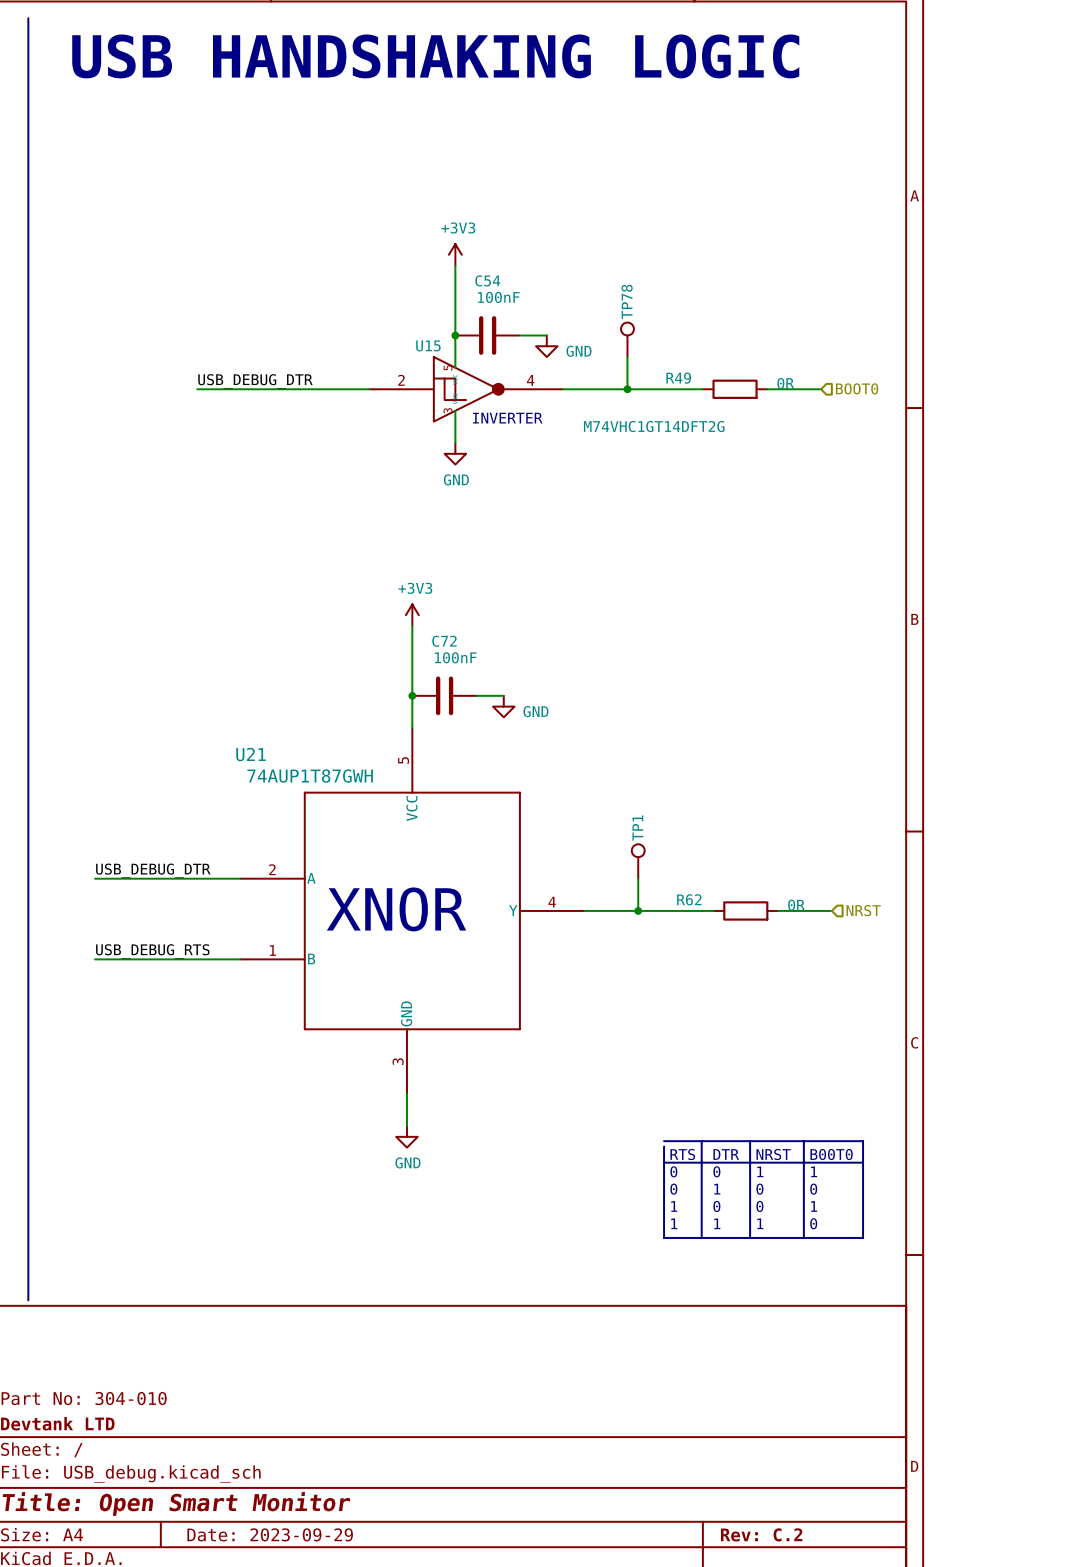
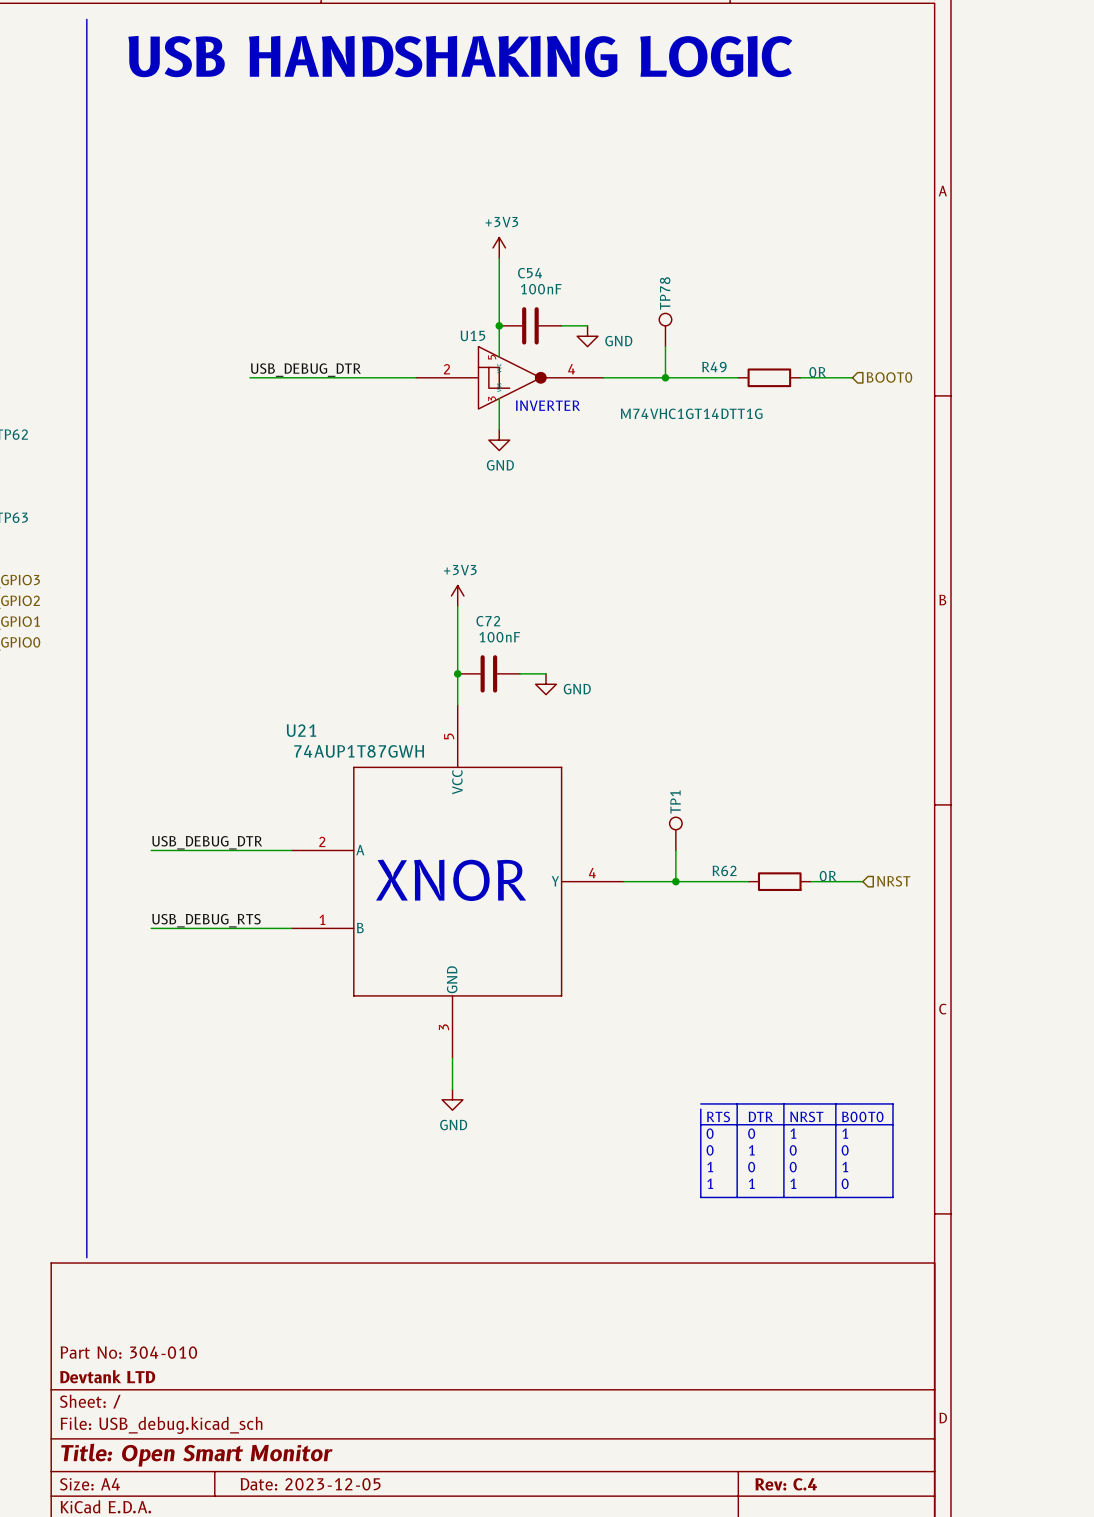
U15 value: M74VHC1GT14DFT2G (654, 426) -> M74VHC1GT14DTT1G (691, 413)
title block: Date: 2023-09-29 (270, 1534) -> Date: 2023-12-05 (310, 1484)
title block: Rev: C.2 (761, 1534) -> Rev: C.4 (786, 1484)

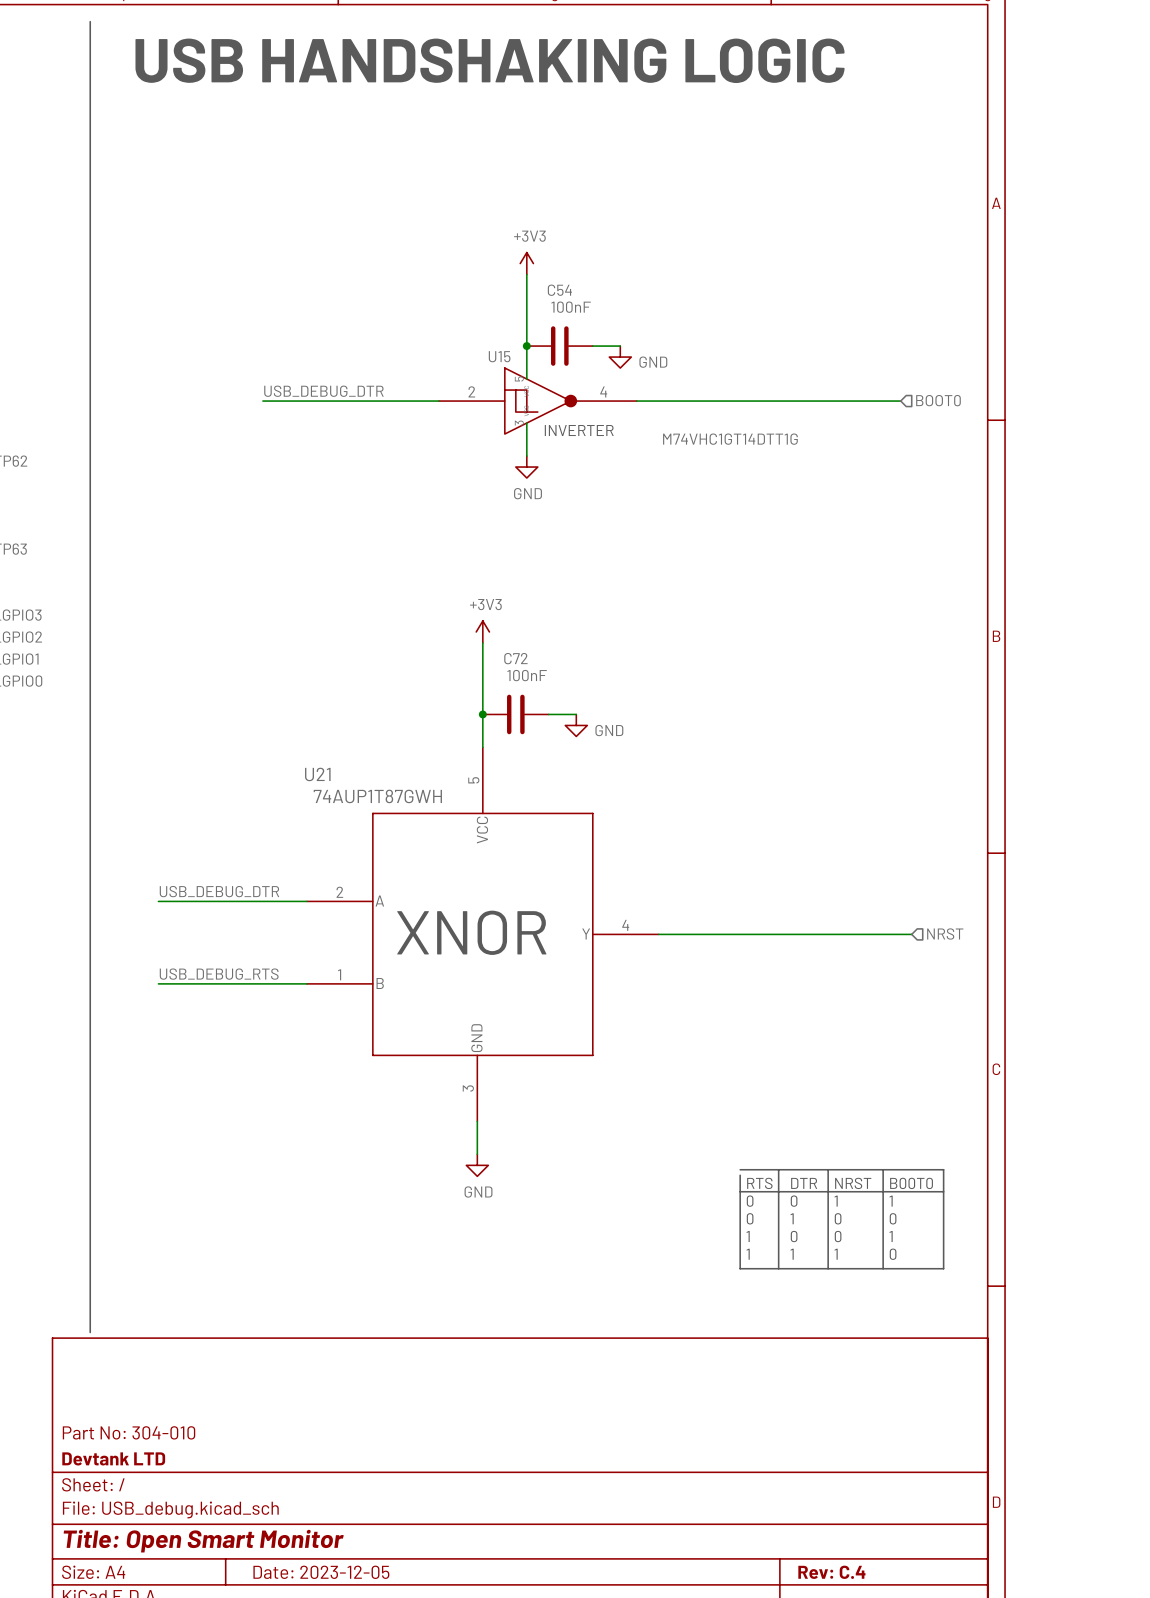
TP78: (665, 330) -> none
wire: (665, 346) (665, 377) -> none
junction: (665, 377) -> none
wire: none -> (779, 401) (845, 401)
R49: 0R (769, 377) -> none
TP1: (675, 833) -> none
wire: (675, 850) (675, 881) -> none
junction: (675, 881) -> none
wire: none -> (790, 934) (856, 934)
R62: 0R (779, 881) -> none

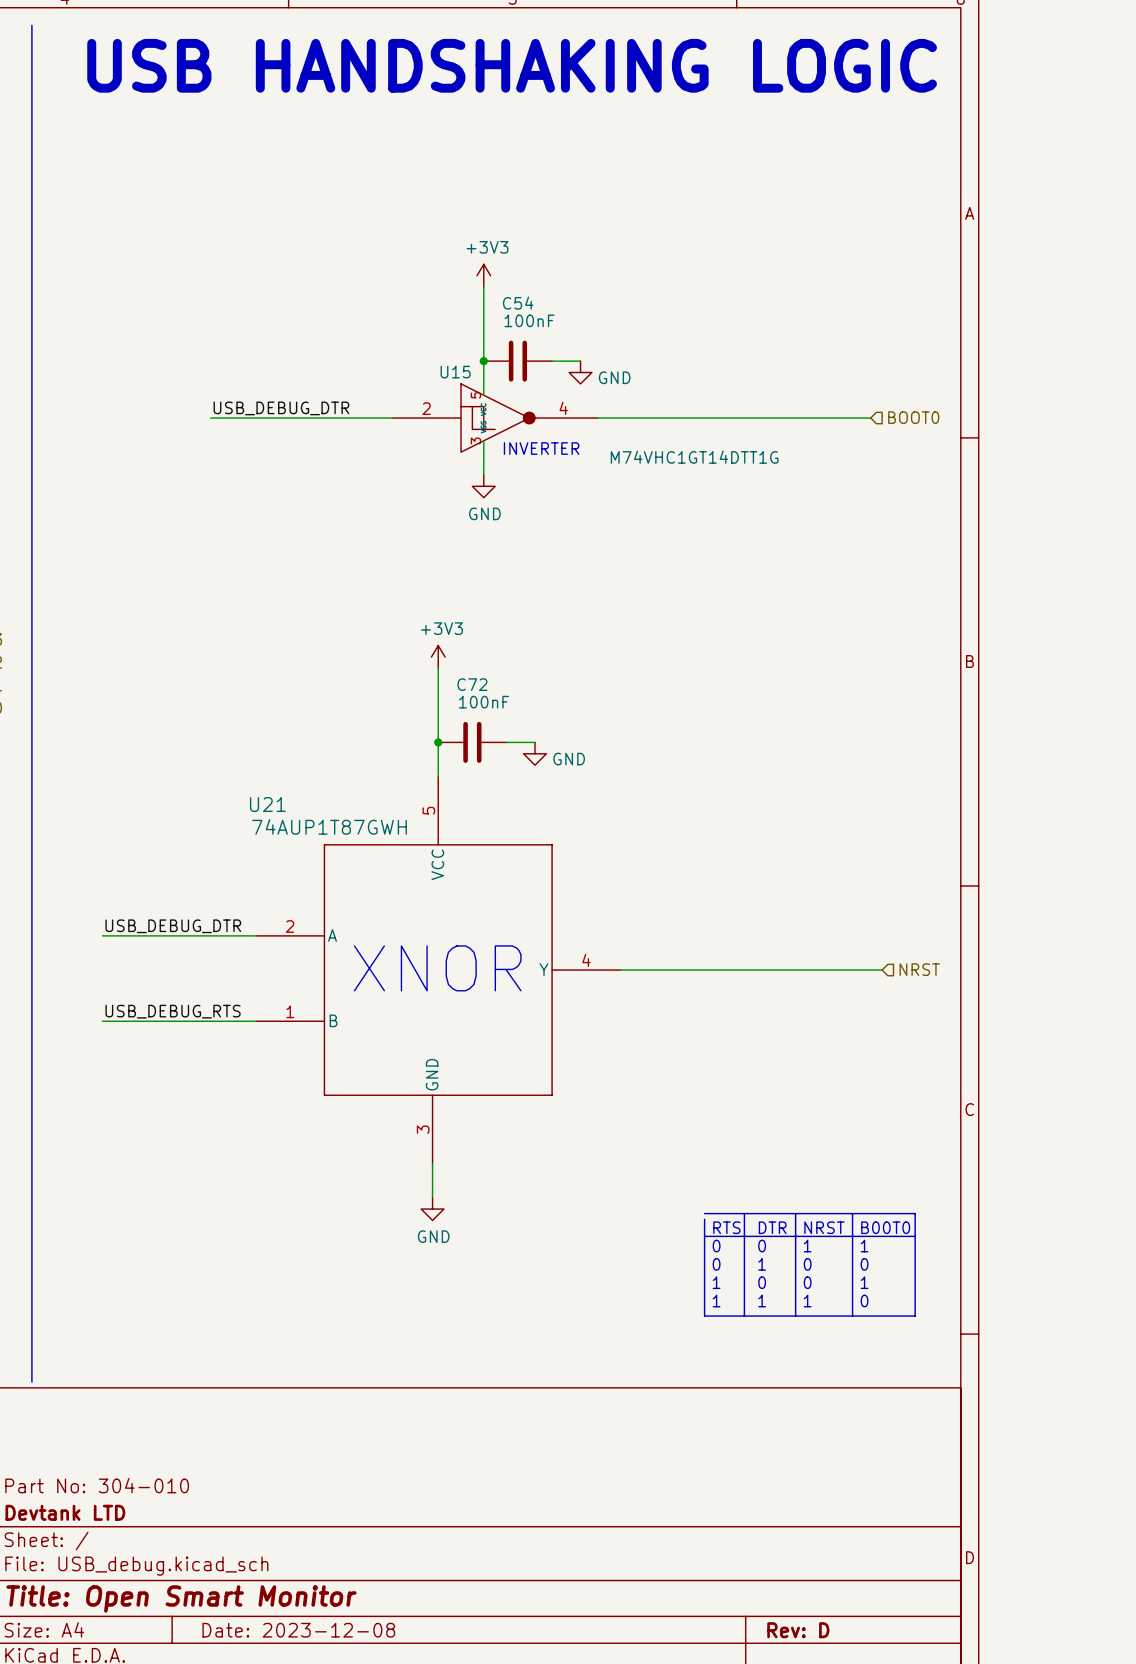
title block: Date: 2023-12-05 (321, 1572) -> Date: 2023-12-08 (298, 1630)
title block: Rev: C.4 (831, 1572) -> Rev: D (798, 1630)

